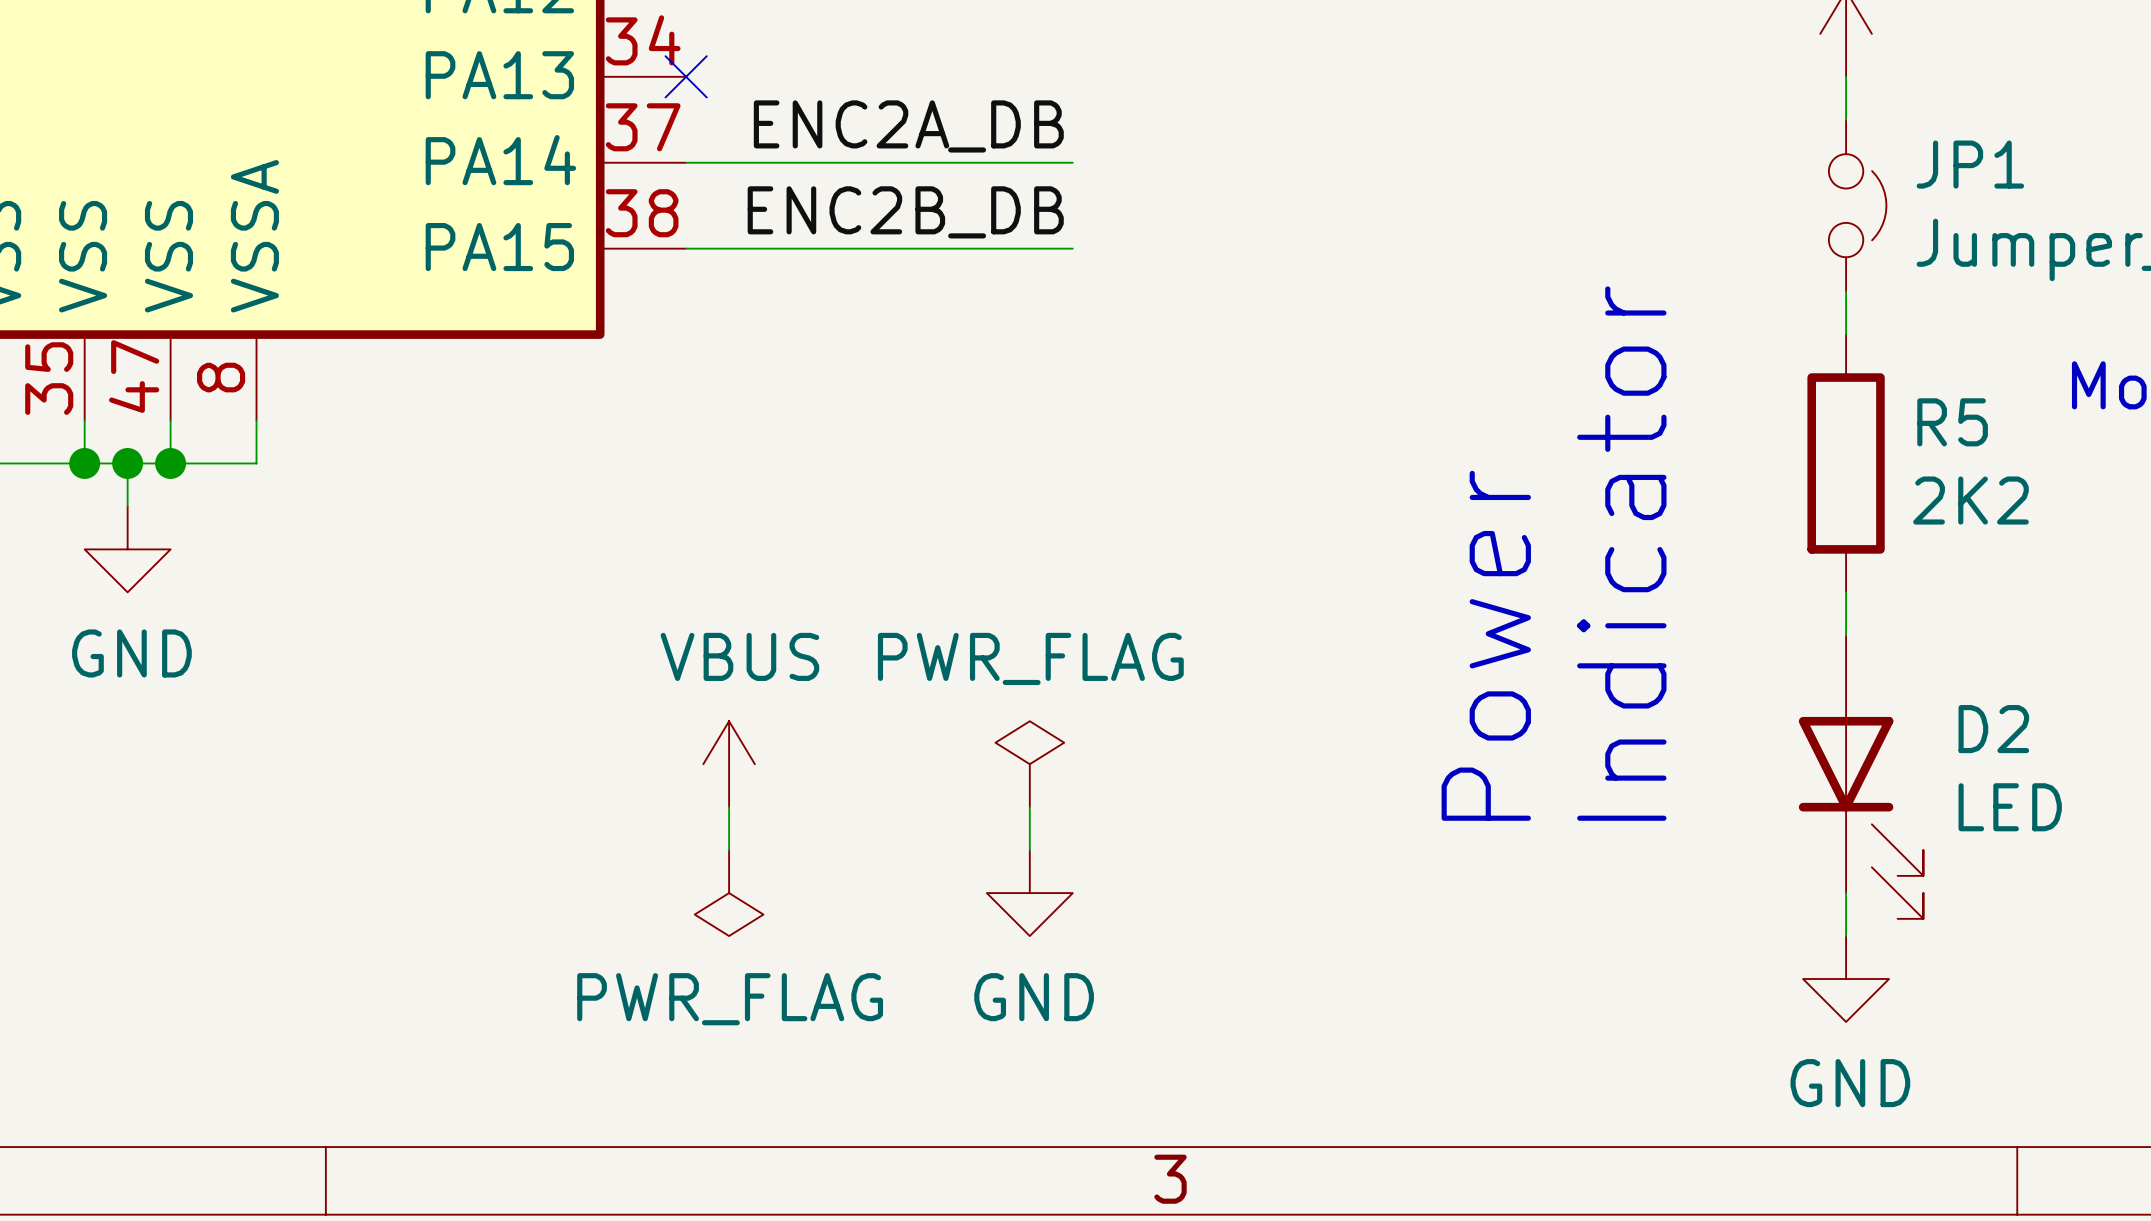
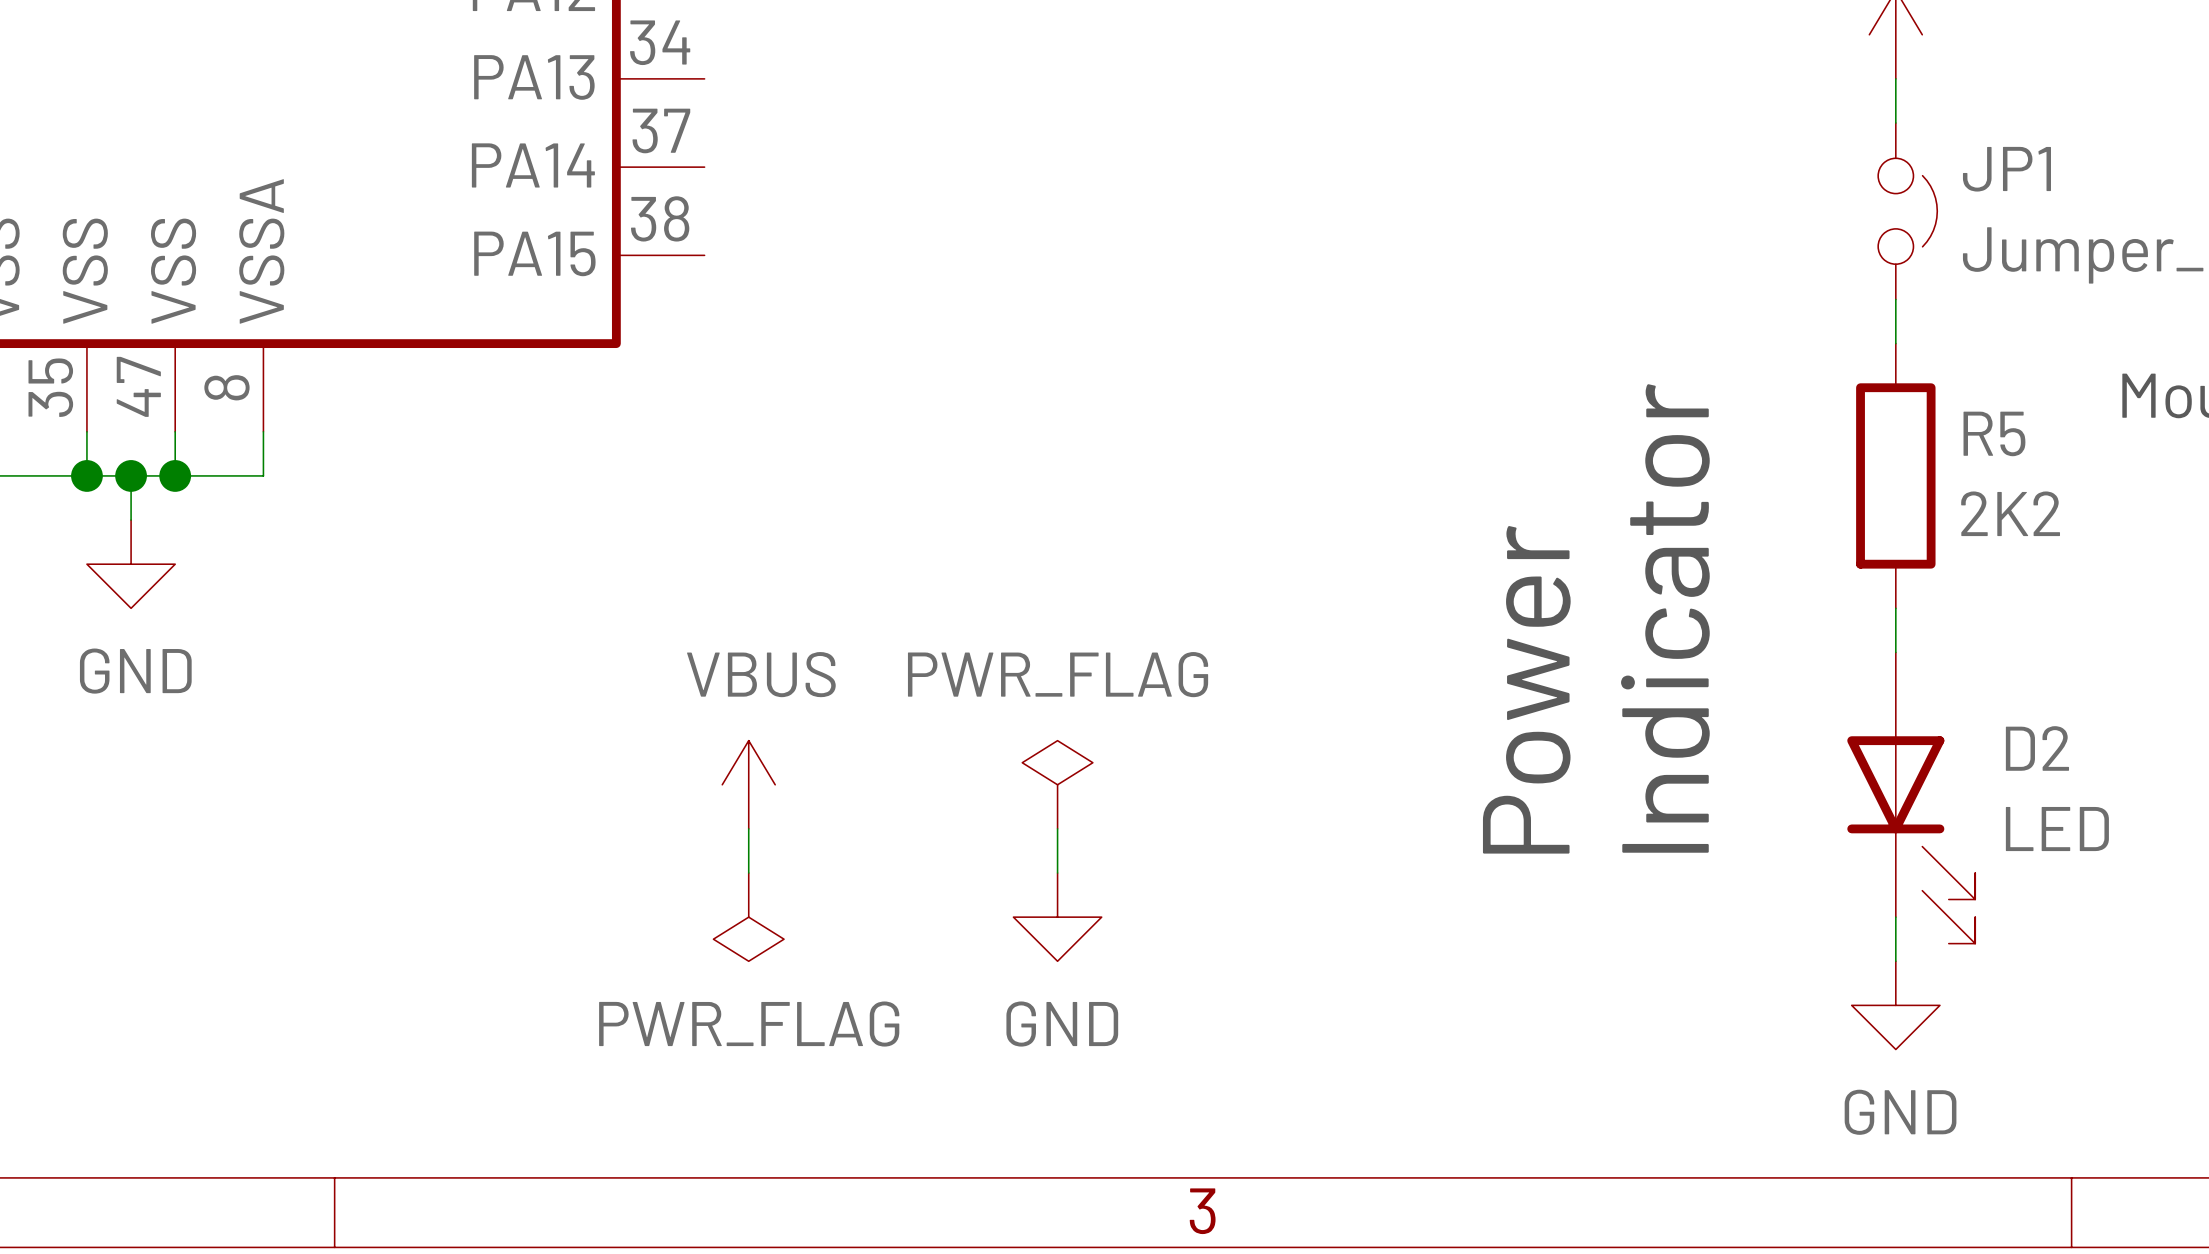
no-connect mark: (686, 76) -> none
label: ENC2A_DB (908, 126) -> none
wire: (686, 162) (1072, 162) -> none
label: ENC2B_DB (905, 212) -> none
wire: (686, 248) (1072, 248) -> none

